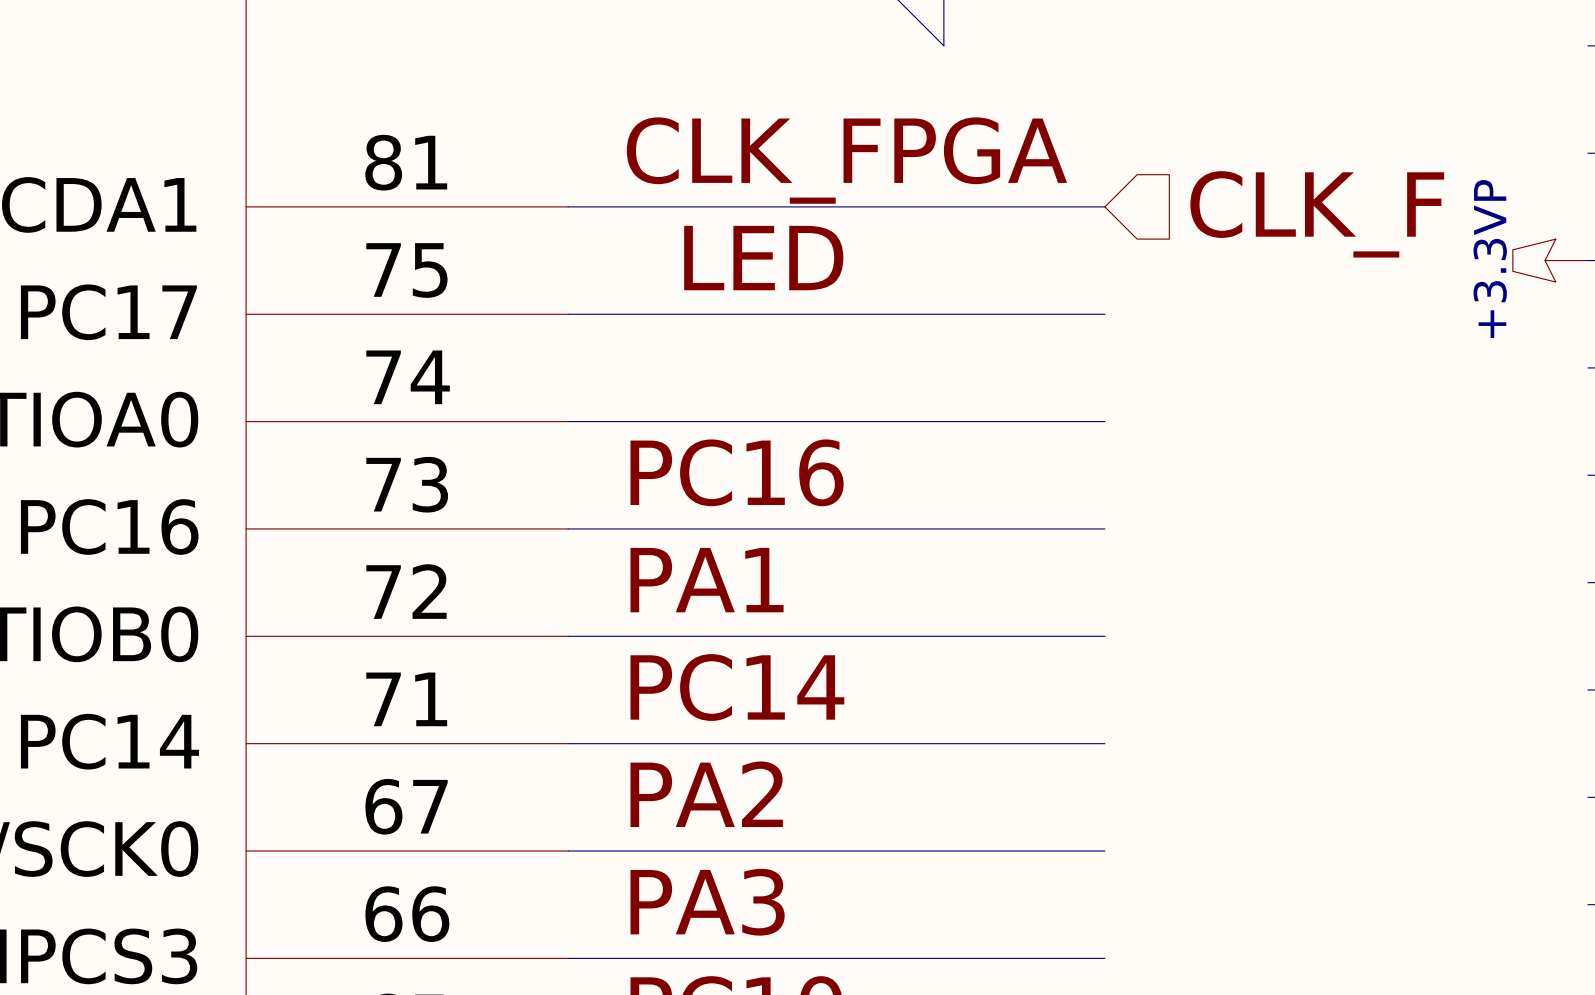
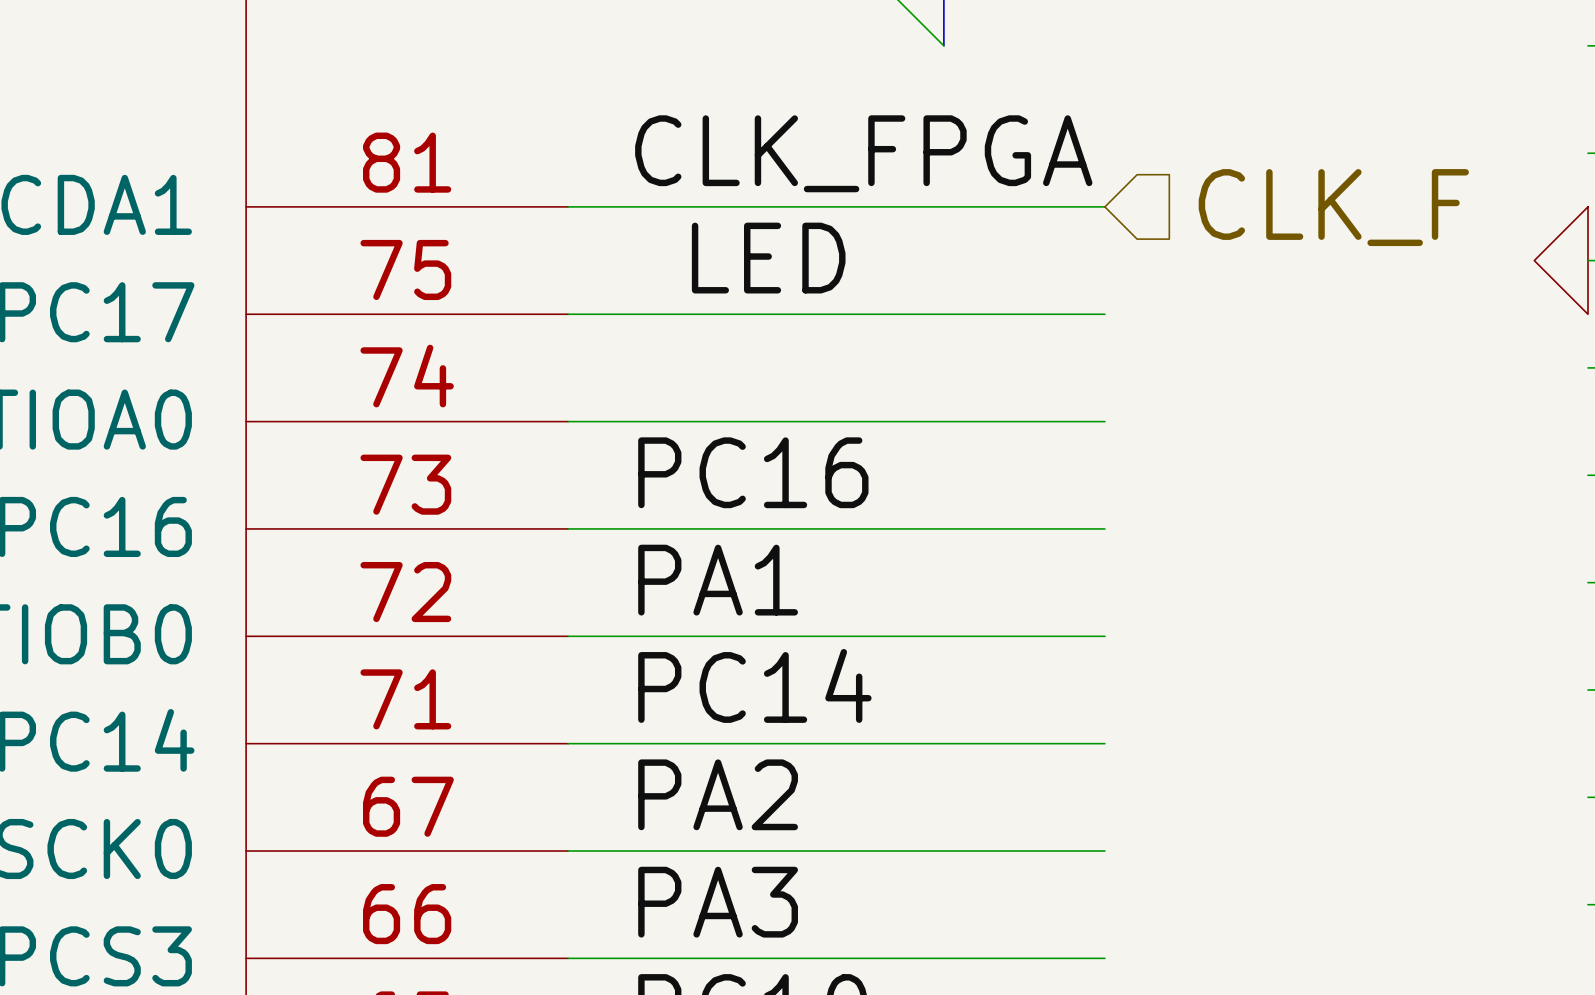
power symbol shape: [1512, 239, 1588, 283] -> [1534, 206, 1588, 315]
power symbol text: +3.3VP (1490, 258) -> none

